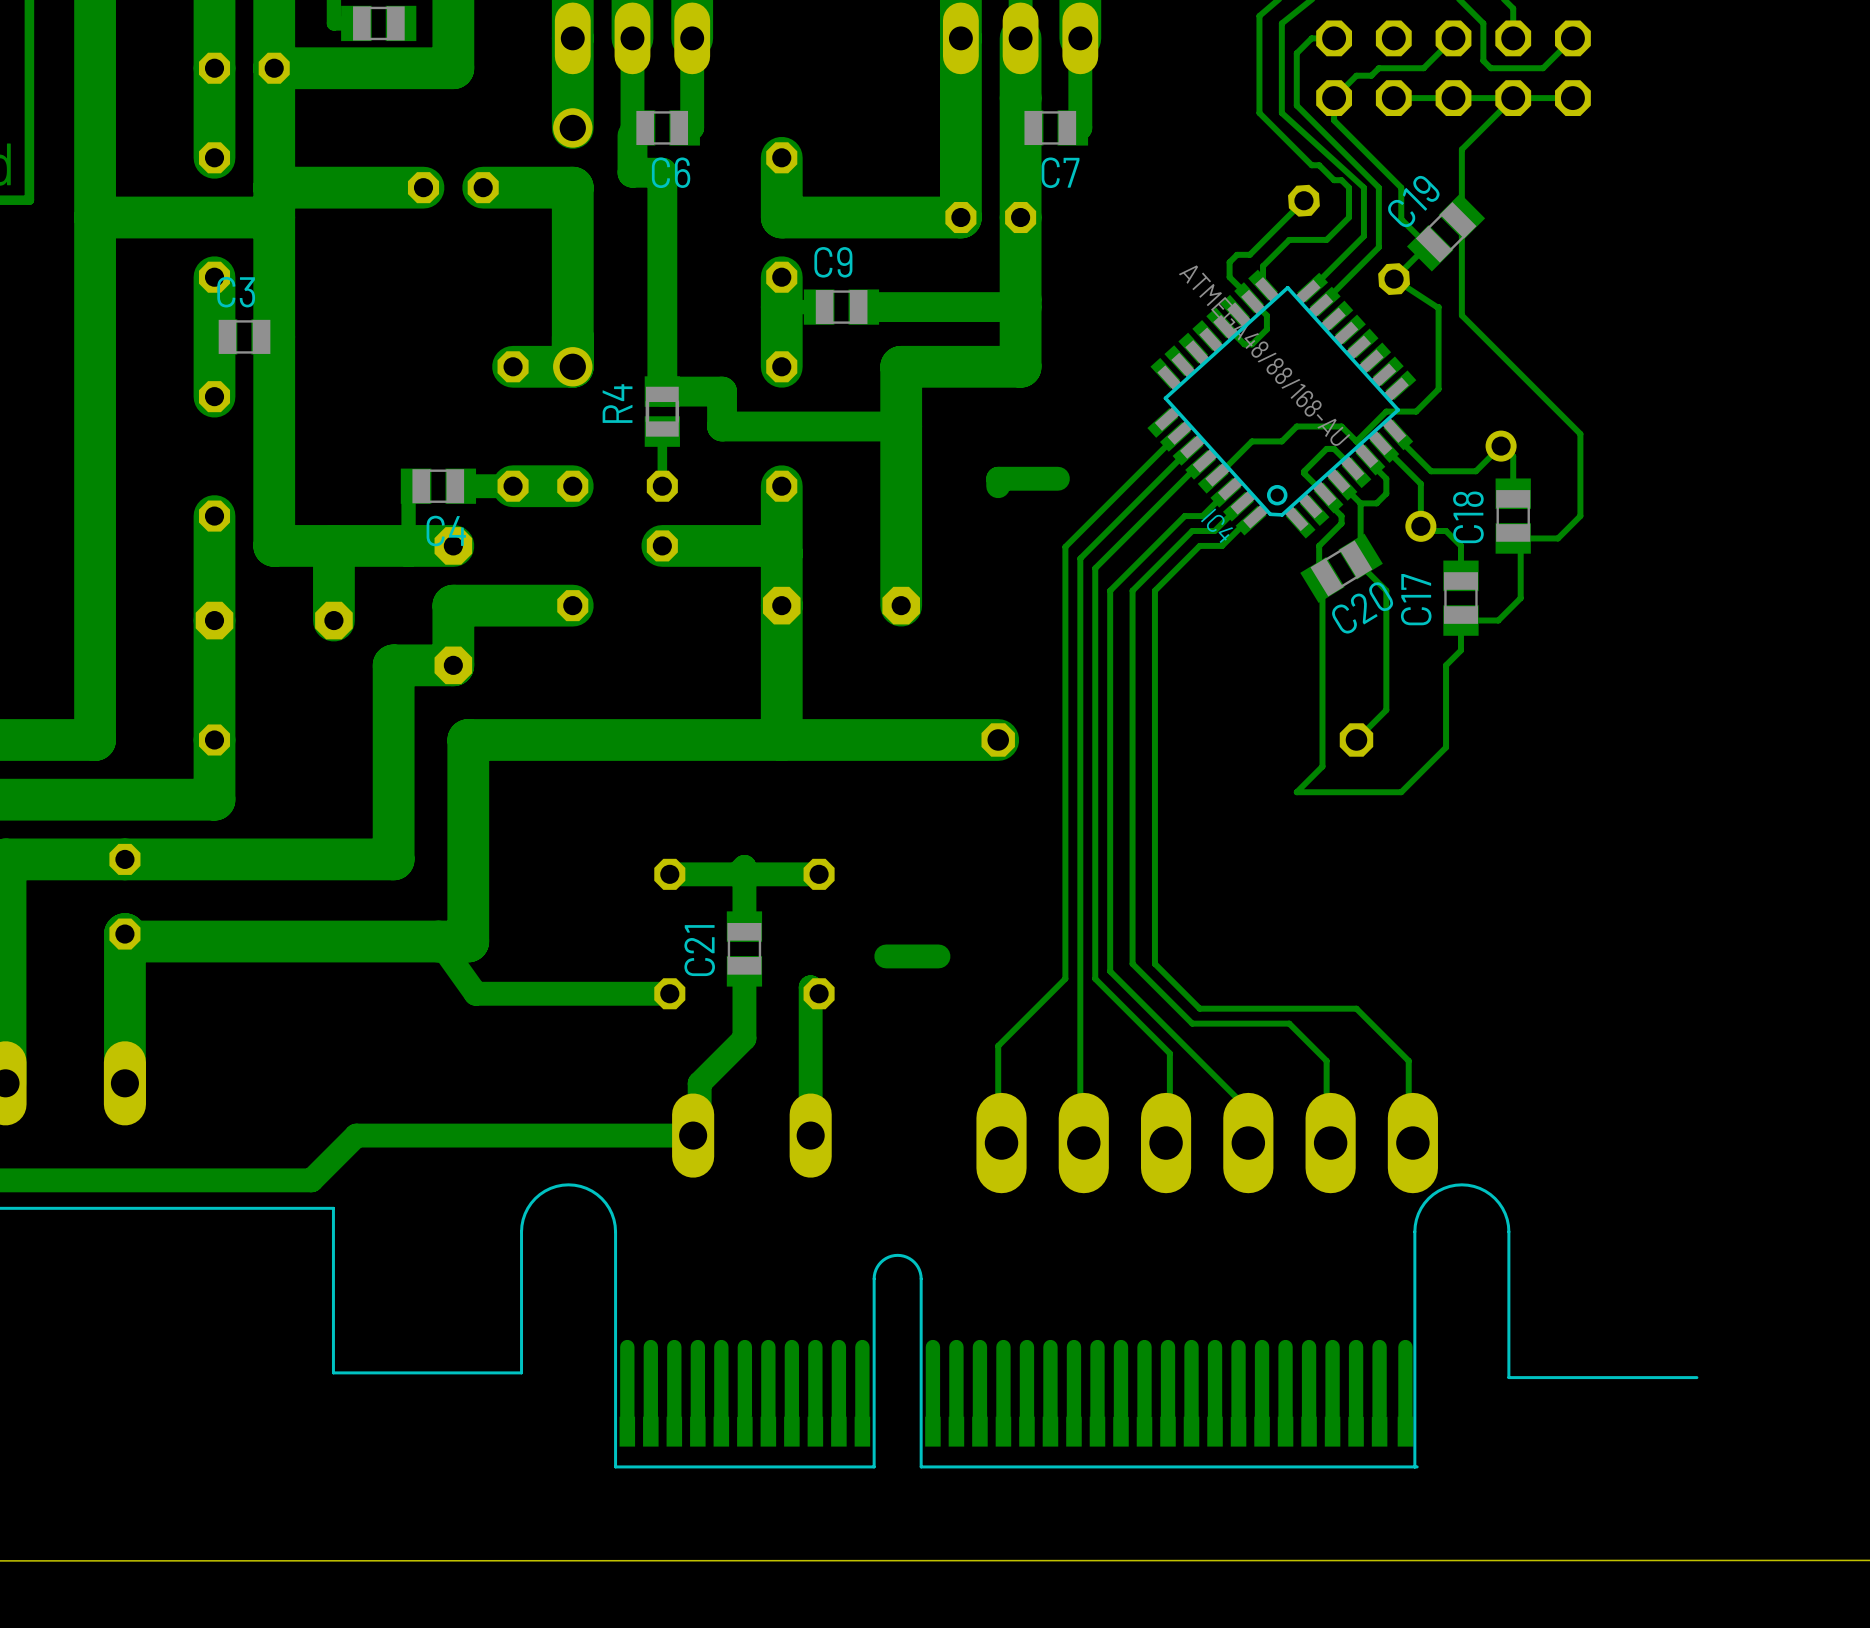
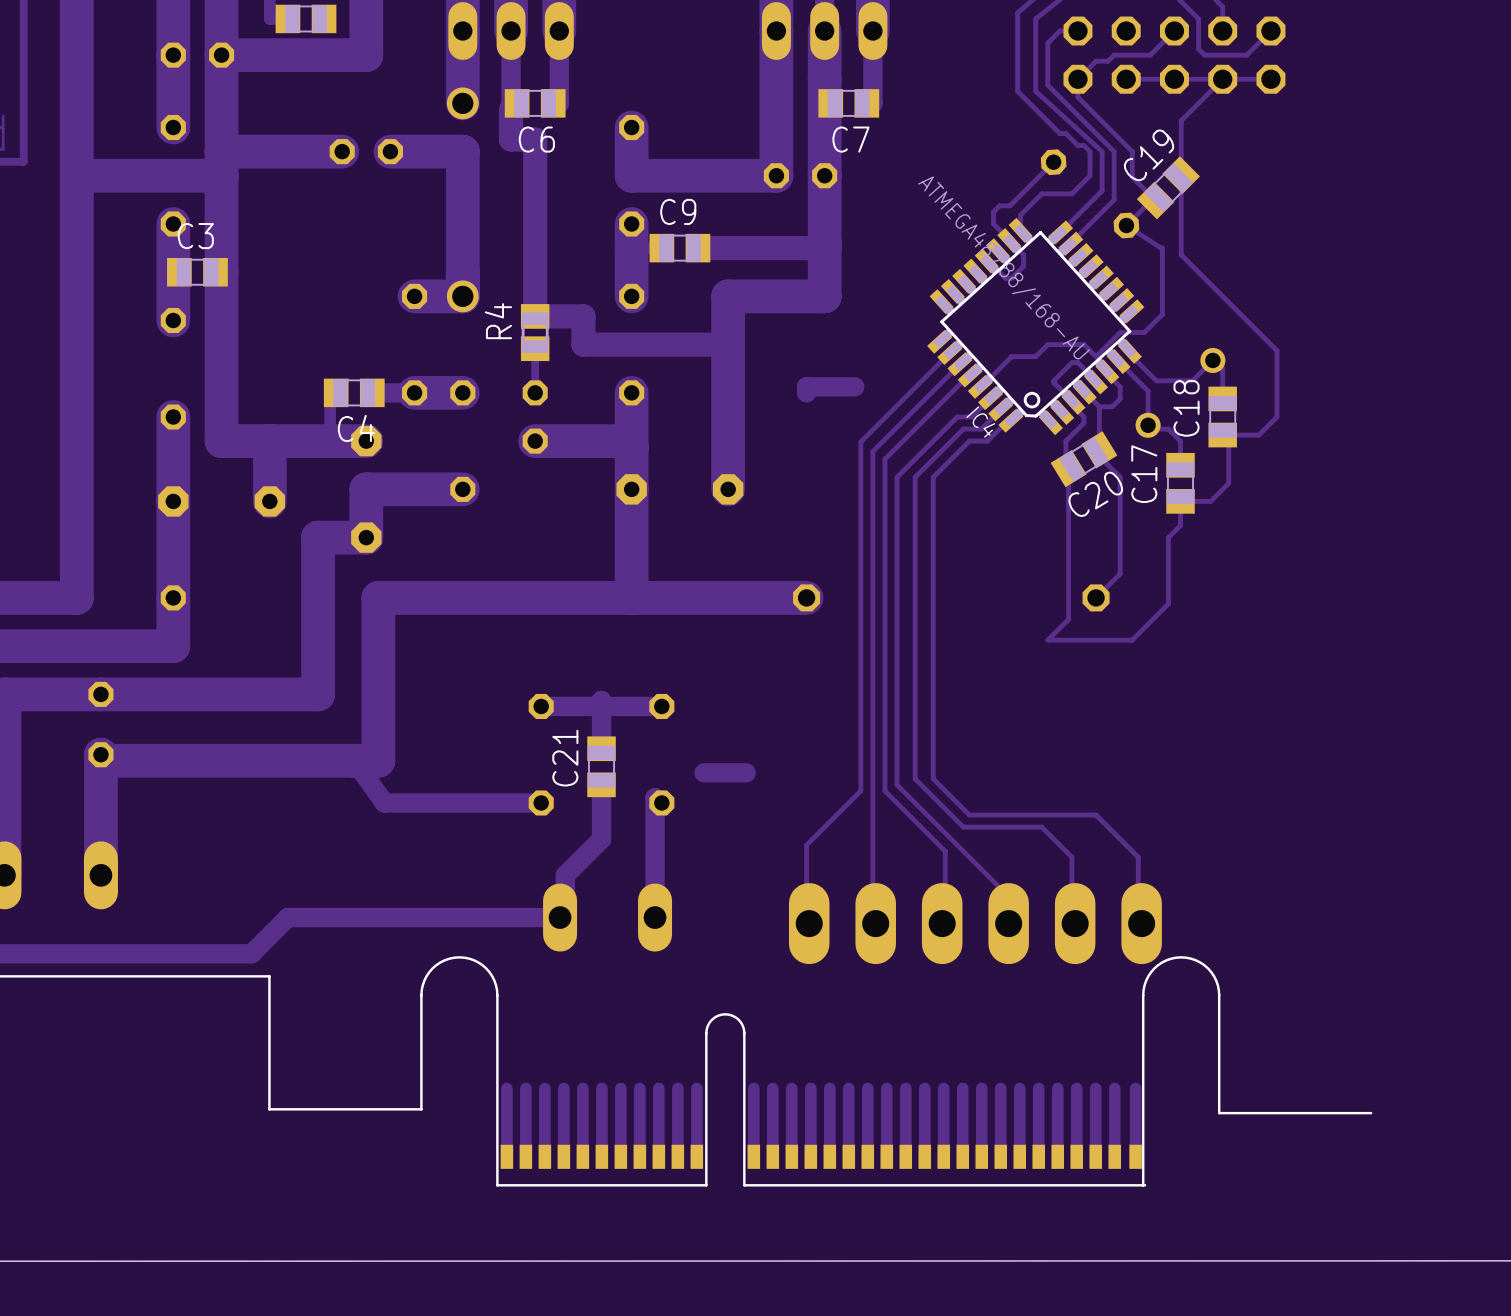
track: (938, 956) (923, 956) -> (716, 772) (704, 772)

